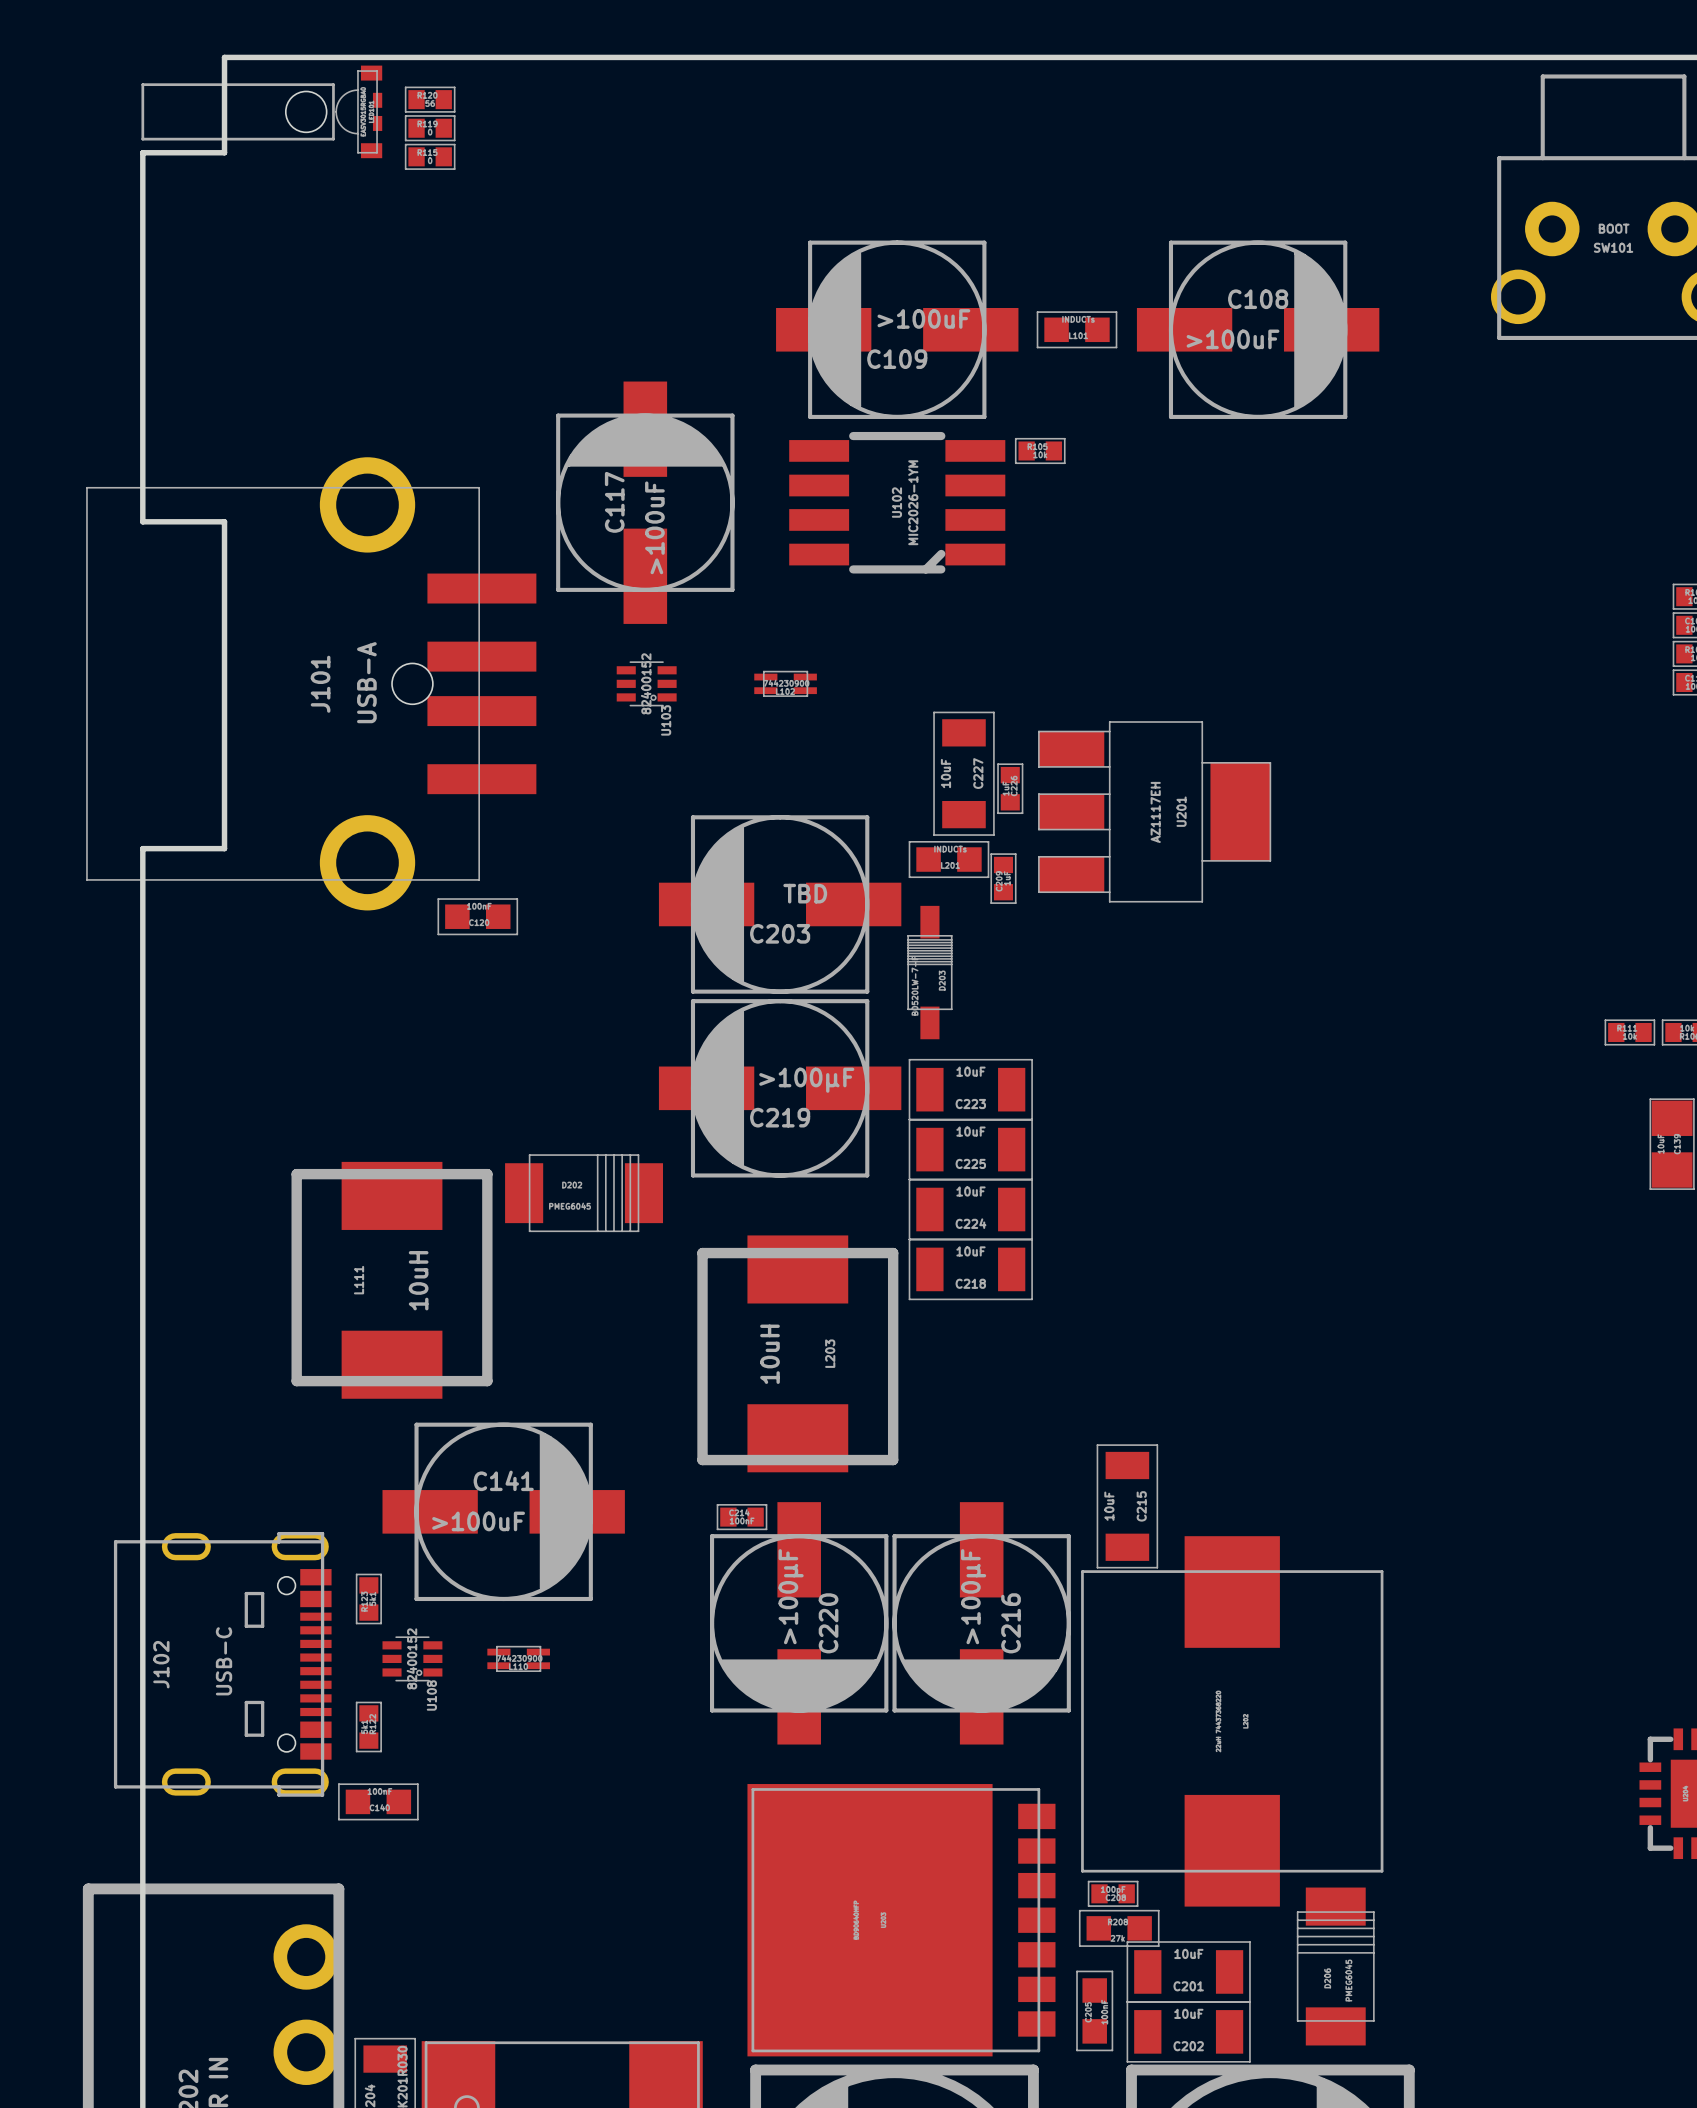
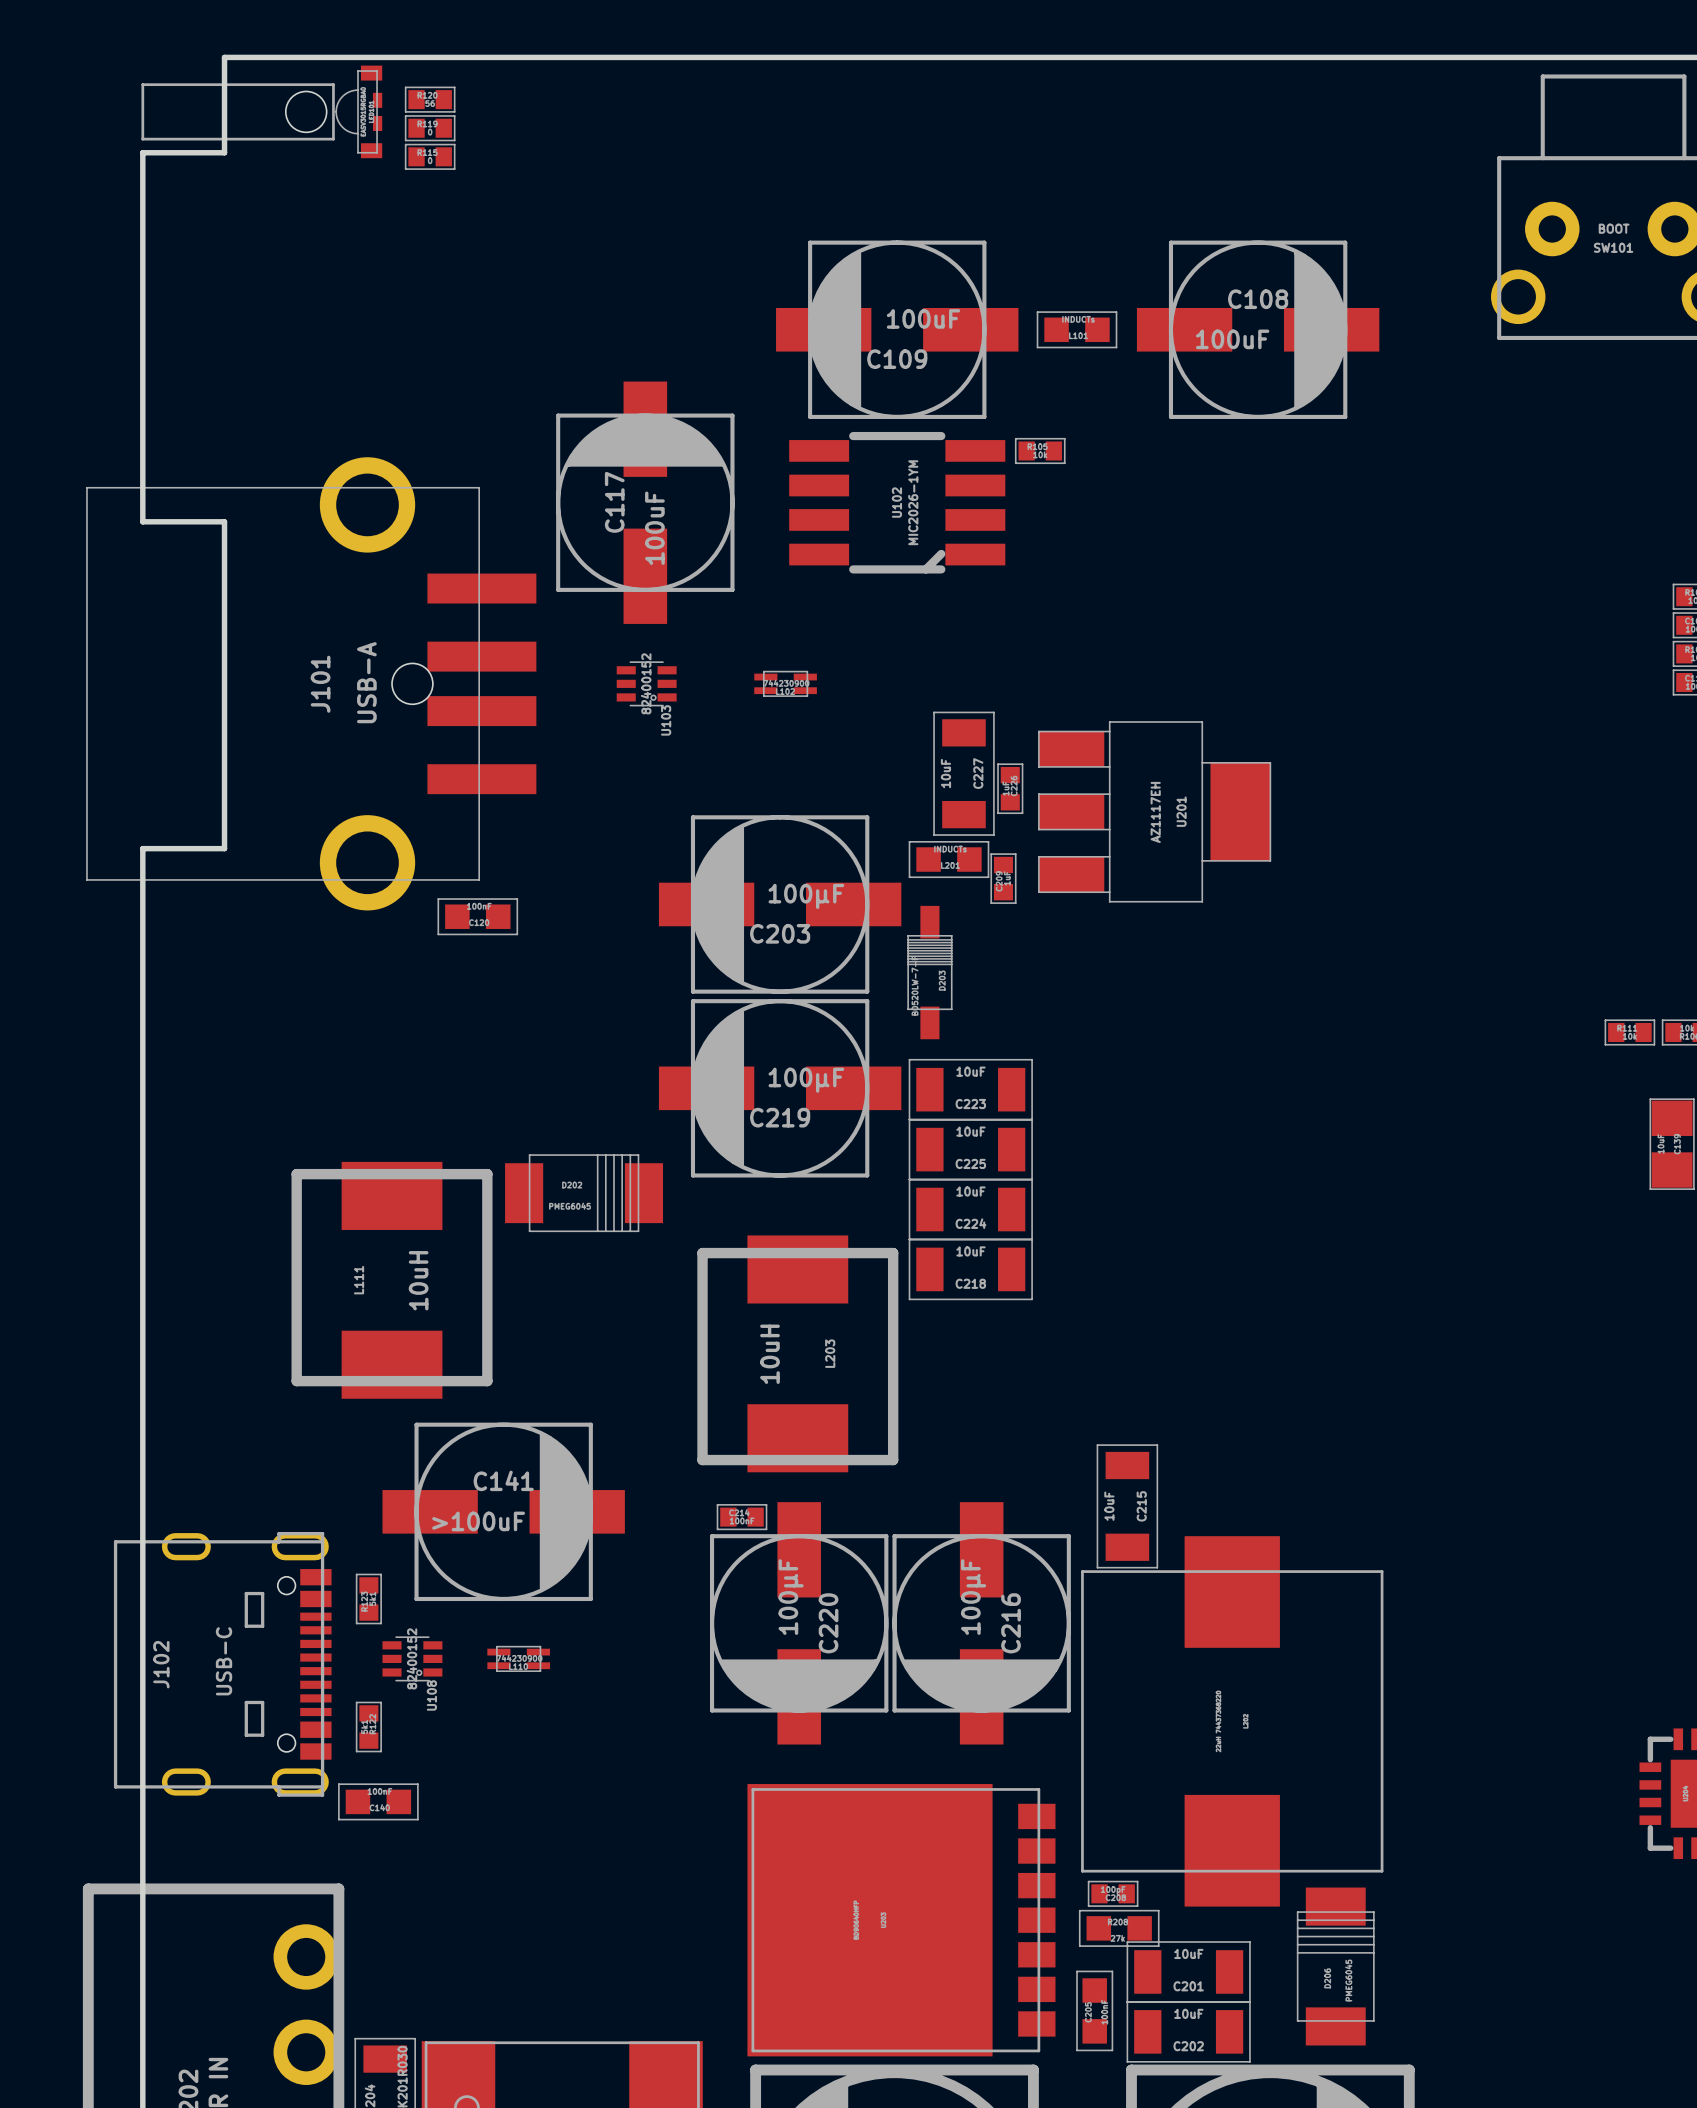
C109 value: >100uF (923, 318) -> 100uF (923, 318)
C108 value: >100uF (1233, 339) -> 100uF (1232, 339)
C117 value: >100uF (654, 527) -> 100uF (654, 528)
C203 value: TBD (805, 893) -> 100µF (806, 896)
C219 value: >100µF (806, 1080) -> 100µF (806, 1080)
C220 value: >100µF (791, 1596) -> 100µF (791, 1597)
C216 value: >100µF (973, 1596) -> 100µF (973, 1597)

